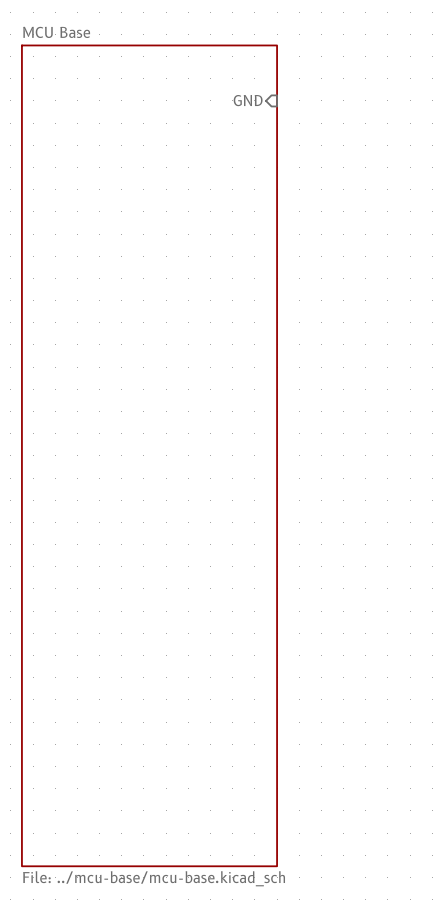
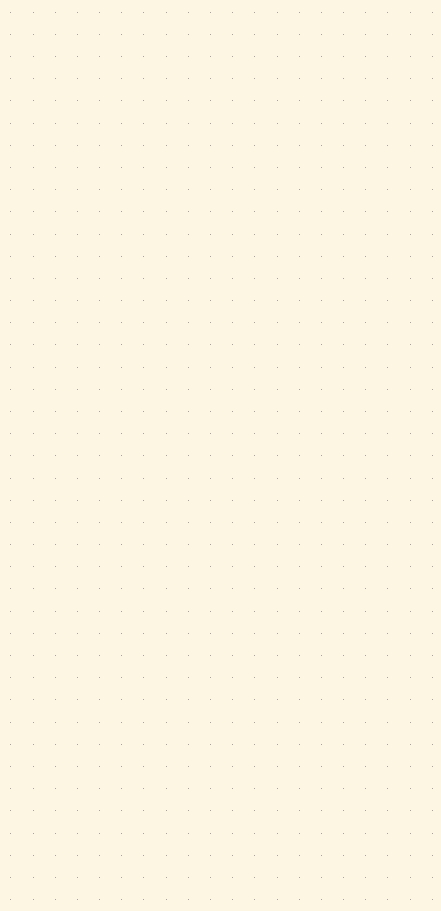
sheet pin: GND (248, 100) -> none
sheet MCU Base: File: ../mcu-base/mcu-base.kicad_sch (149, 455) -> none

